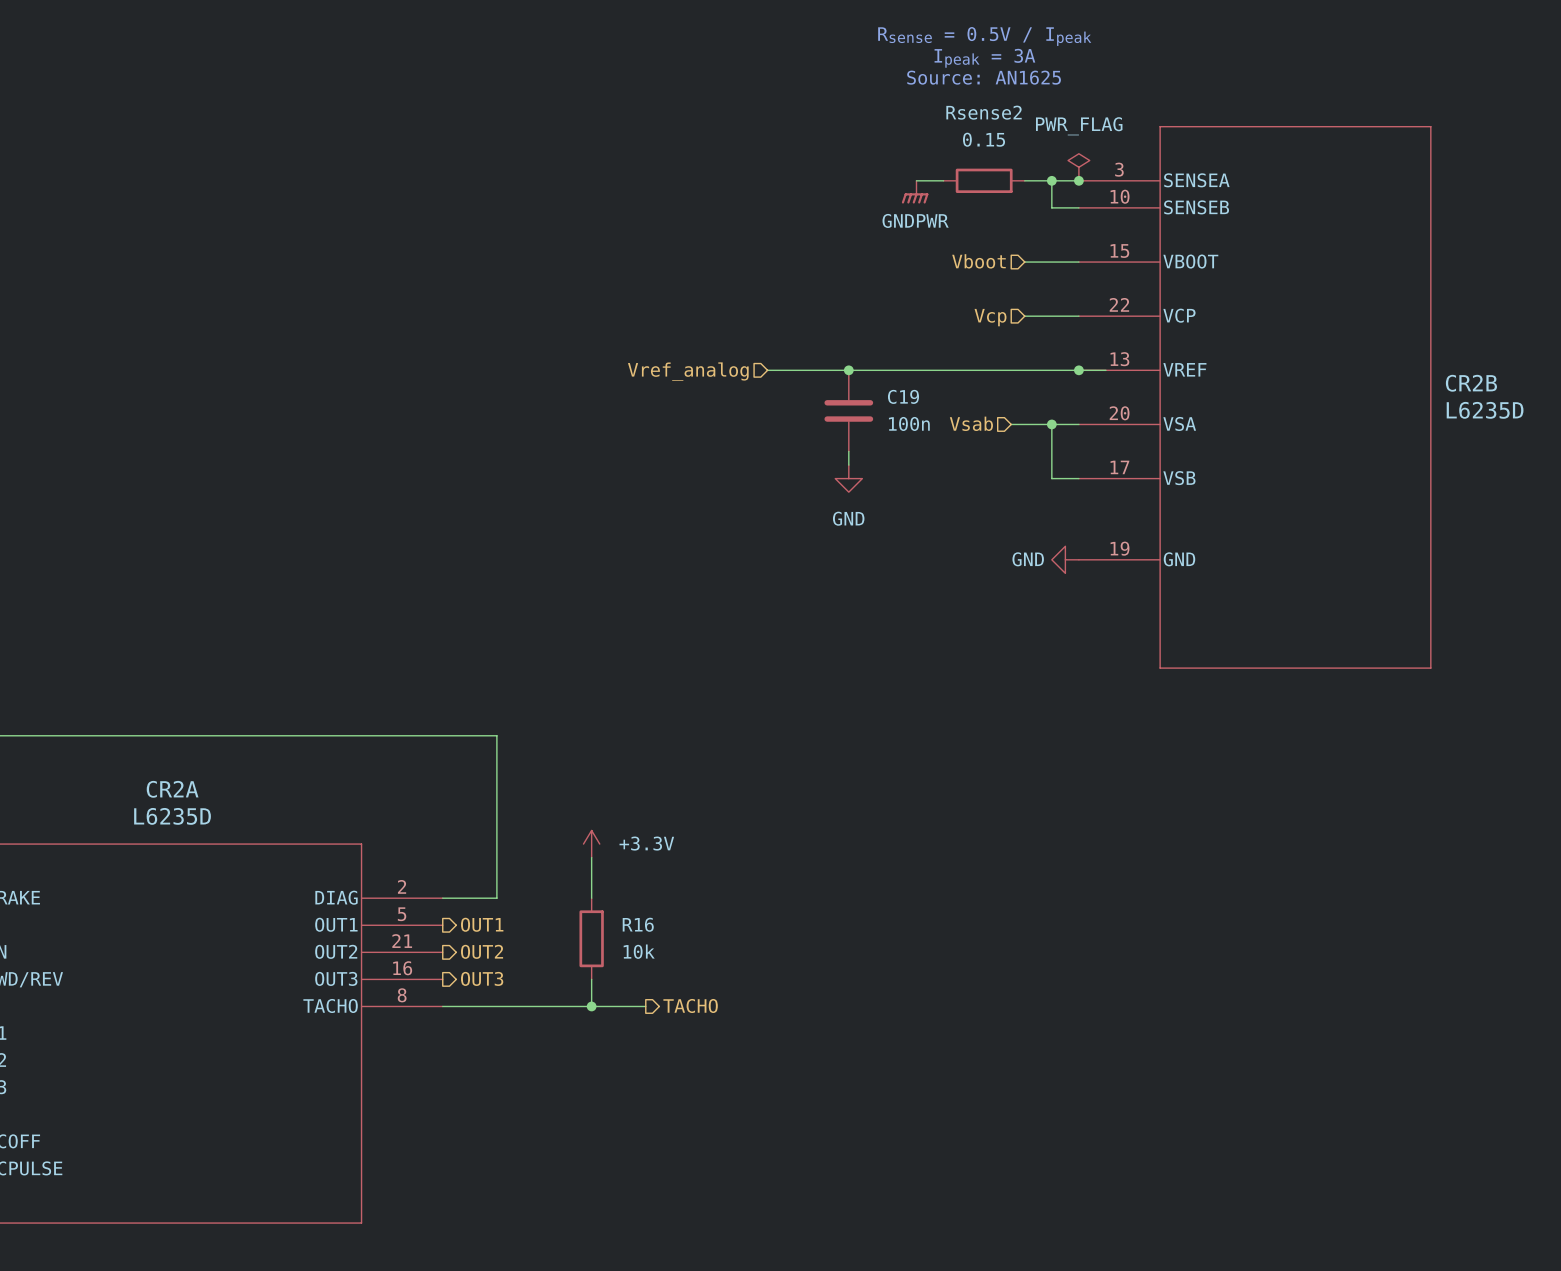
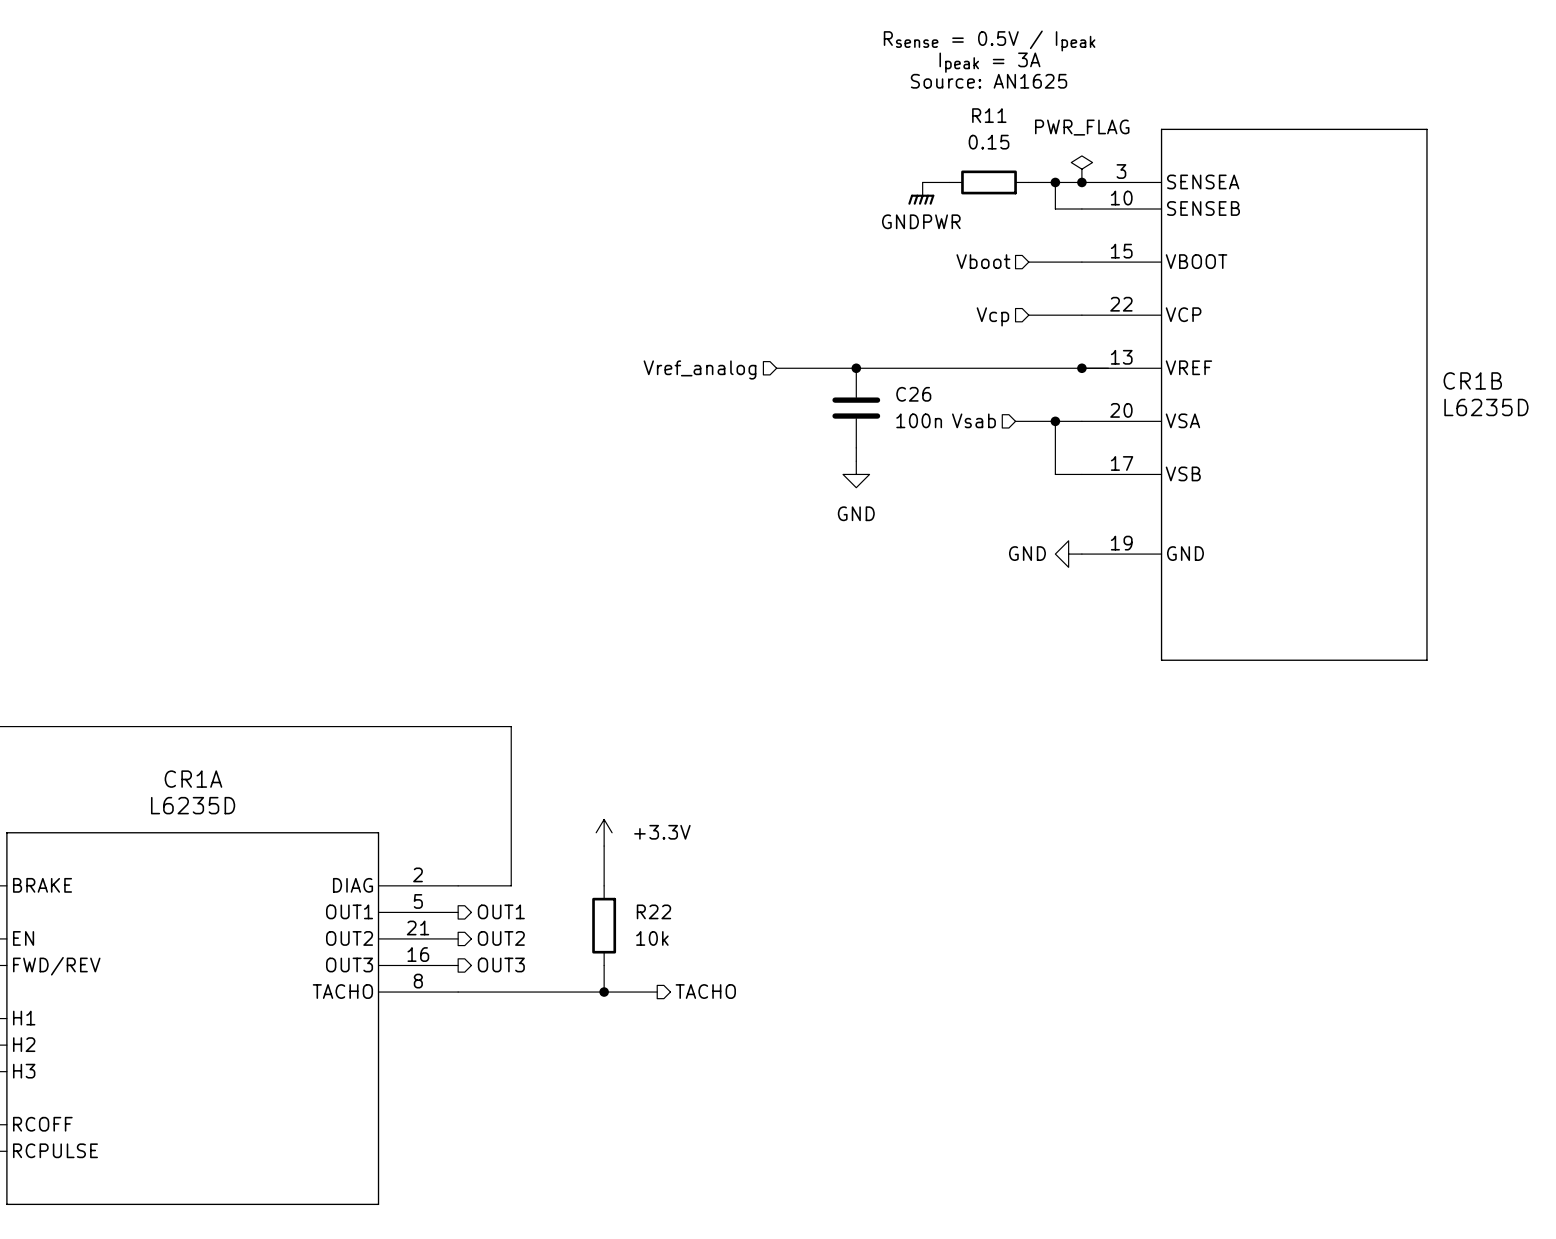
Rsense2 name: Rsense2 (984, 112) -> R11 (989, 115)
CR2B name: CR2B (1471, 383) -> CR1B (1472, 380)
C19 name: C19 (903, 396) -> C26 (913, 394)
CR2A name: CR2A (172, 789) -> CR1A (193, 779)
R16 name: R16 (638, 924) -> R22 (653, 911)

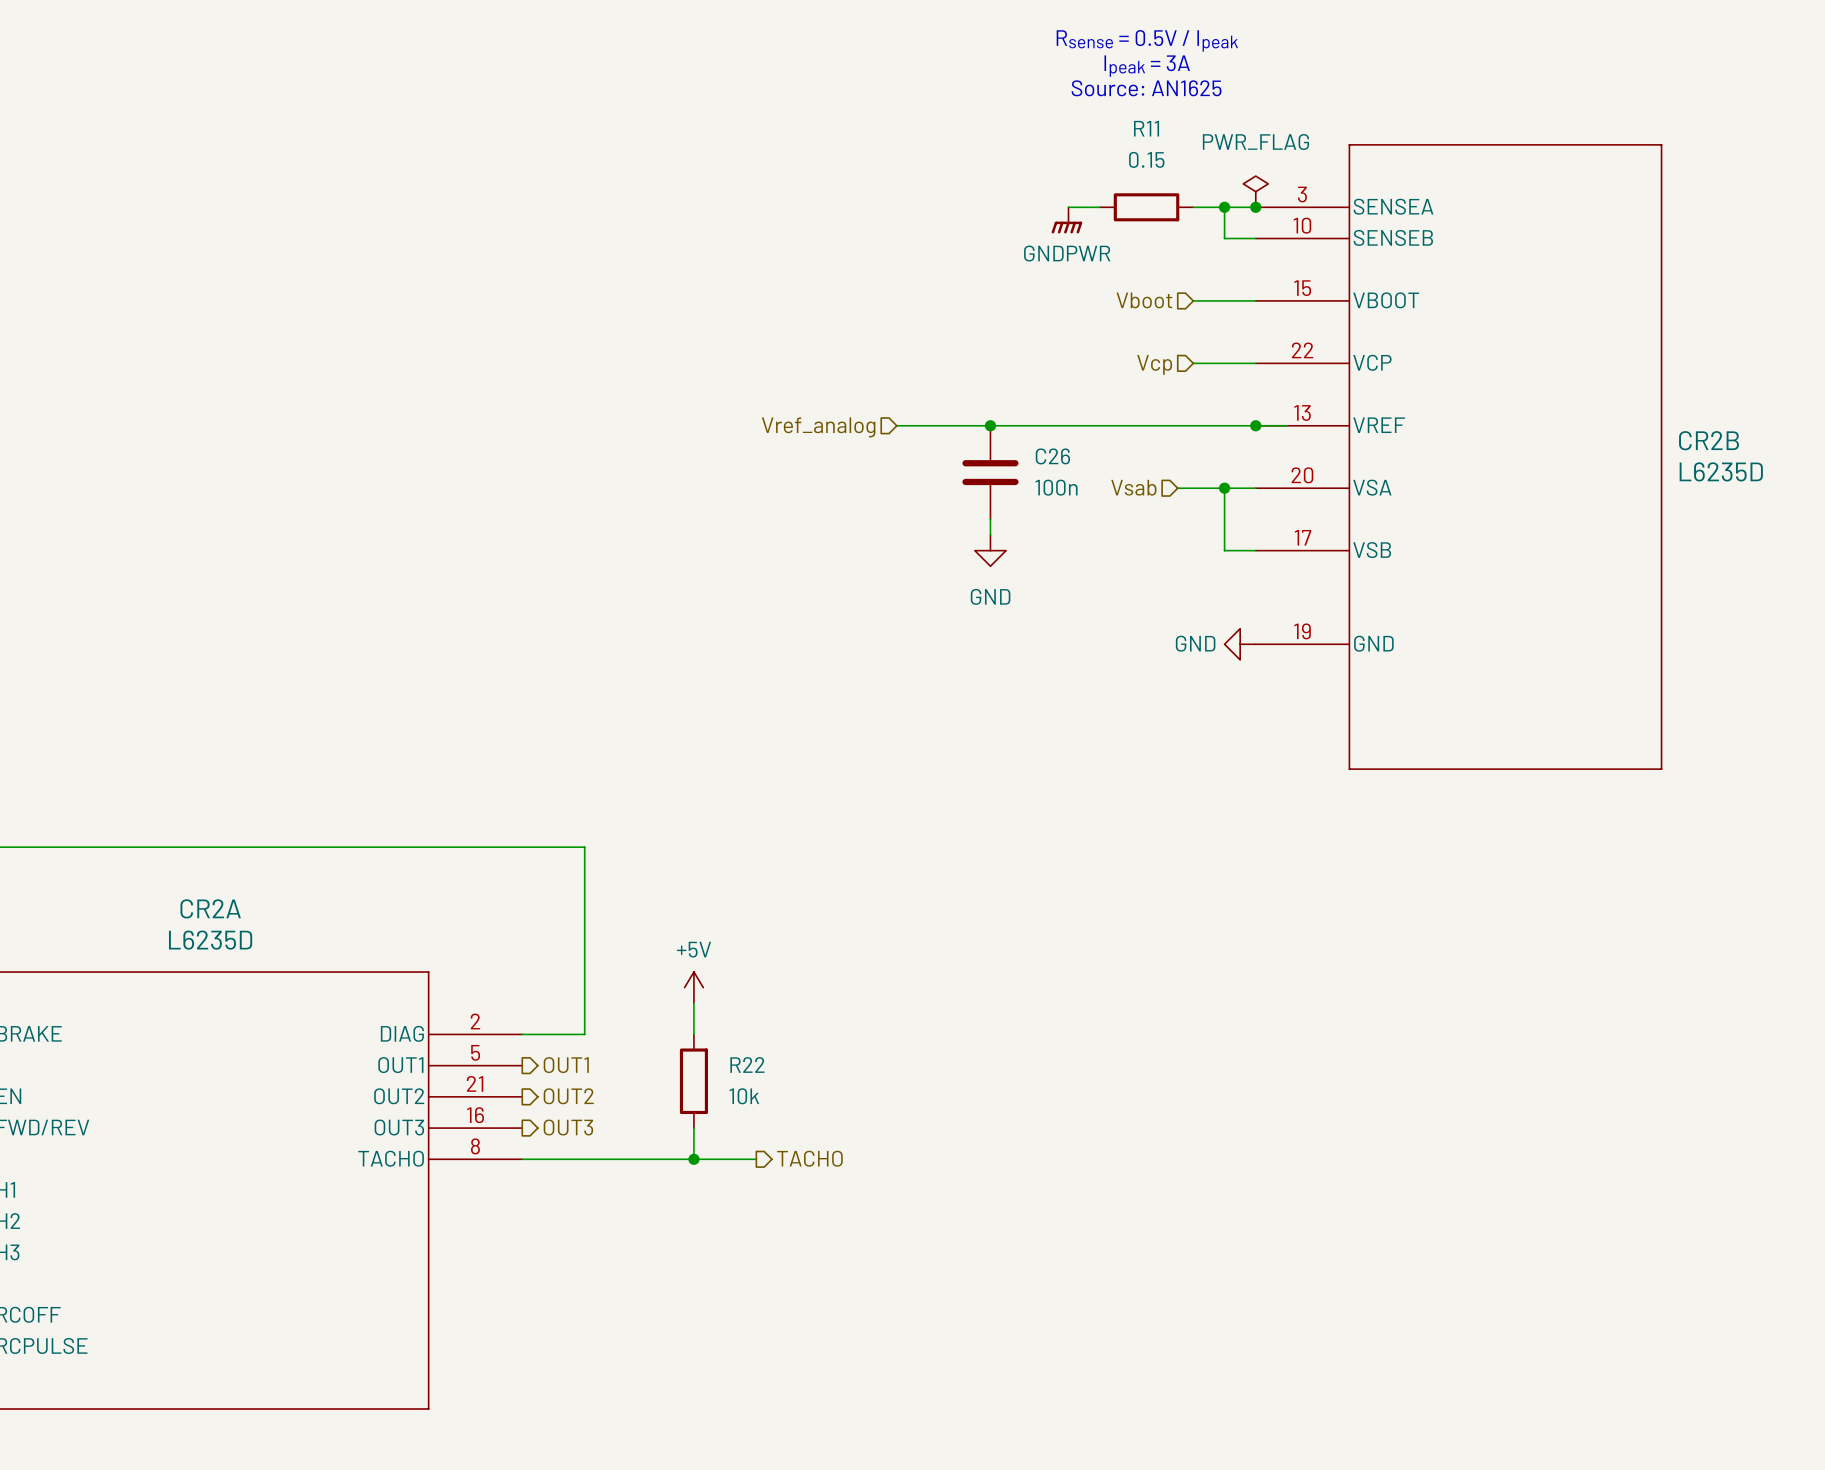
CR1B name: CR1B (1472, 380) -> CR2B (1709, 440)
CR1A name: CR1A (193, 779) -> CR2A (210, 908)
power symbol: +3.3V (604, 832) -> none
power symbol: none -> +5V (693, 987)

